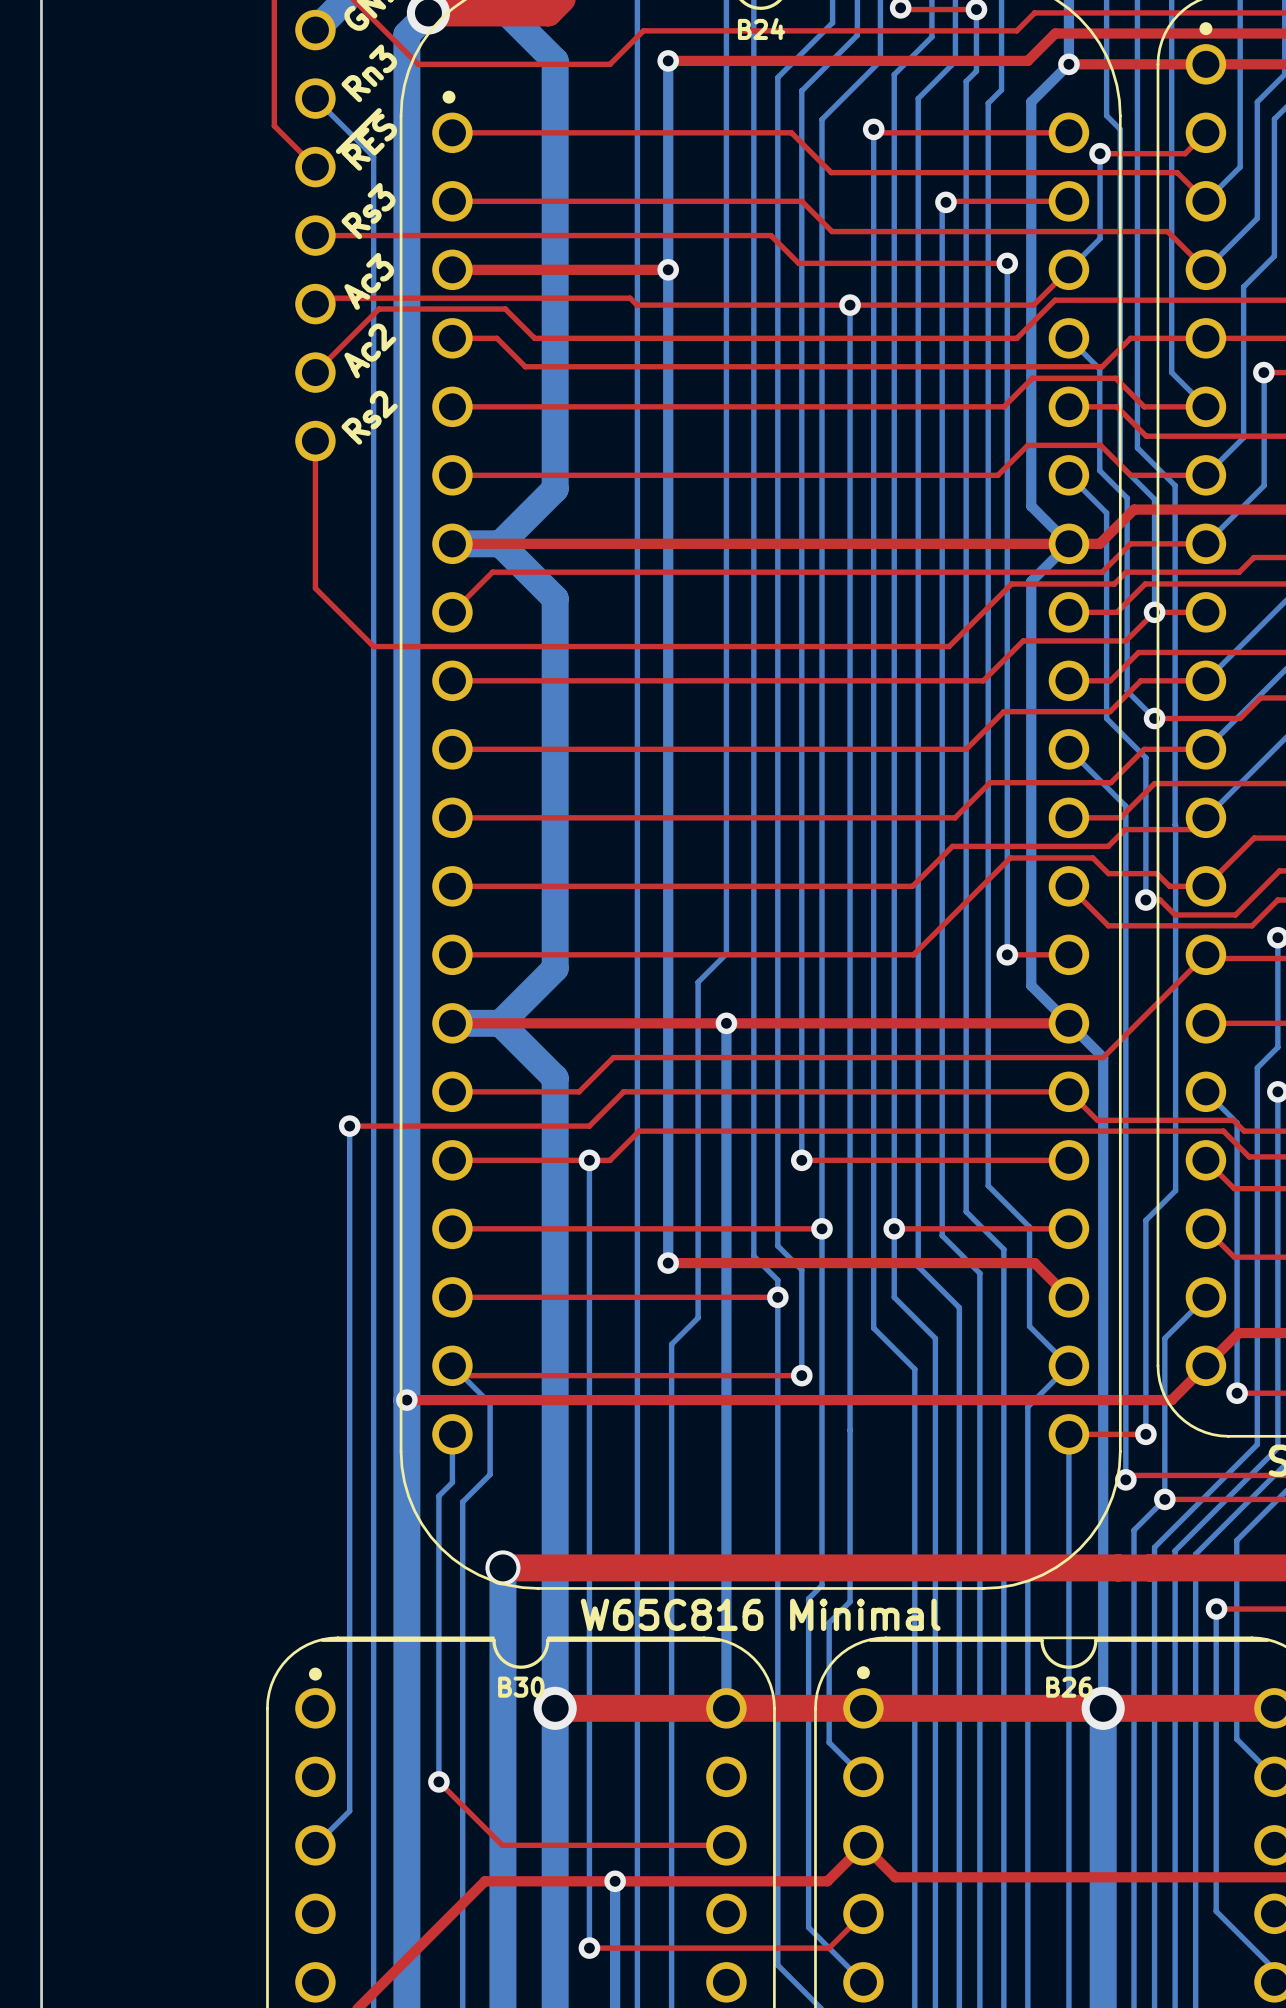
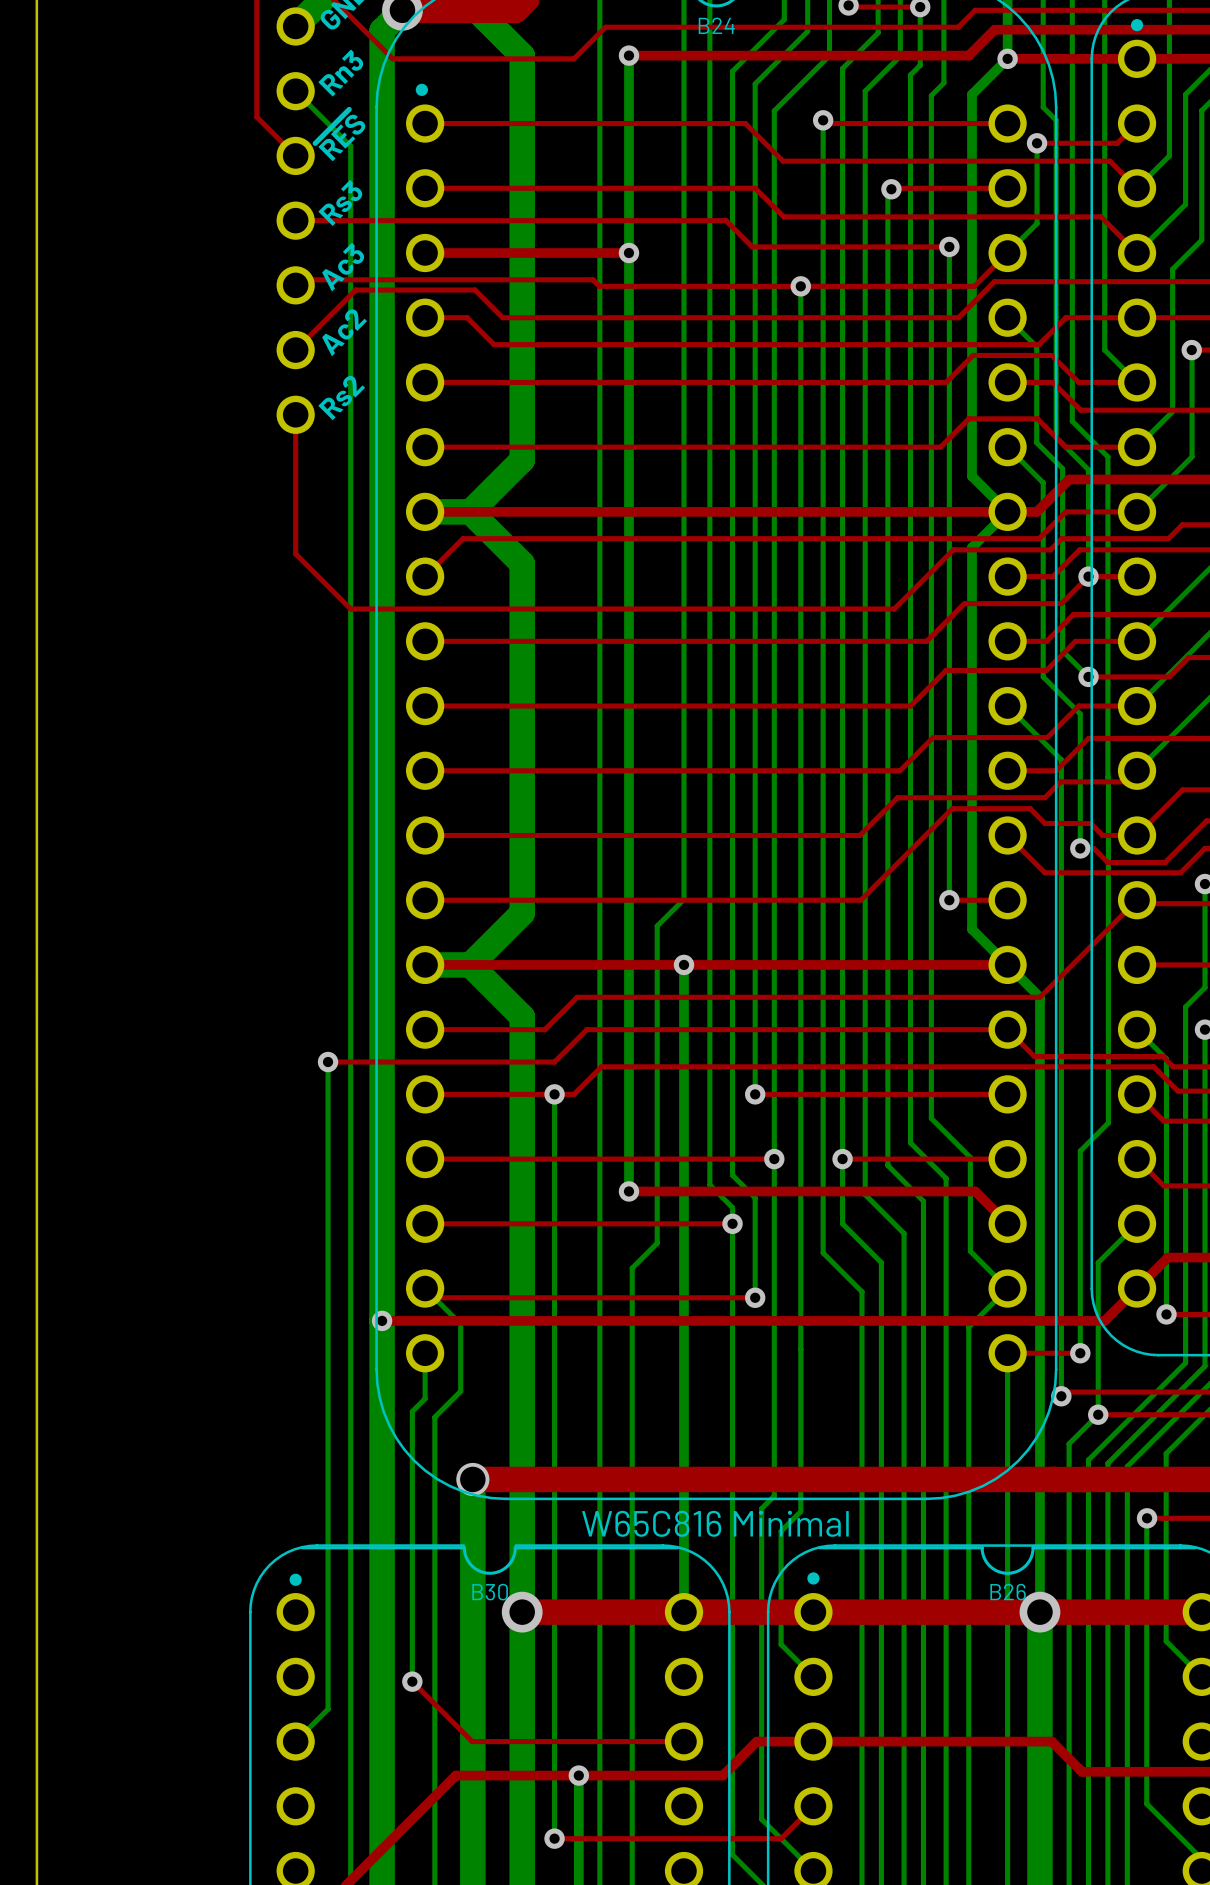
top track: (1147, 1877) (895, 1877) (863, 1845) (827, 1881) (767, 1881) -> (1082, 1771) (1051, 1741) (756, 1741) (722, 1775)

